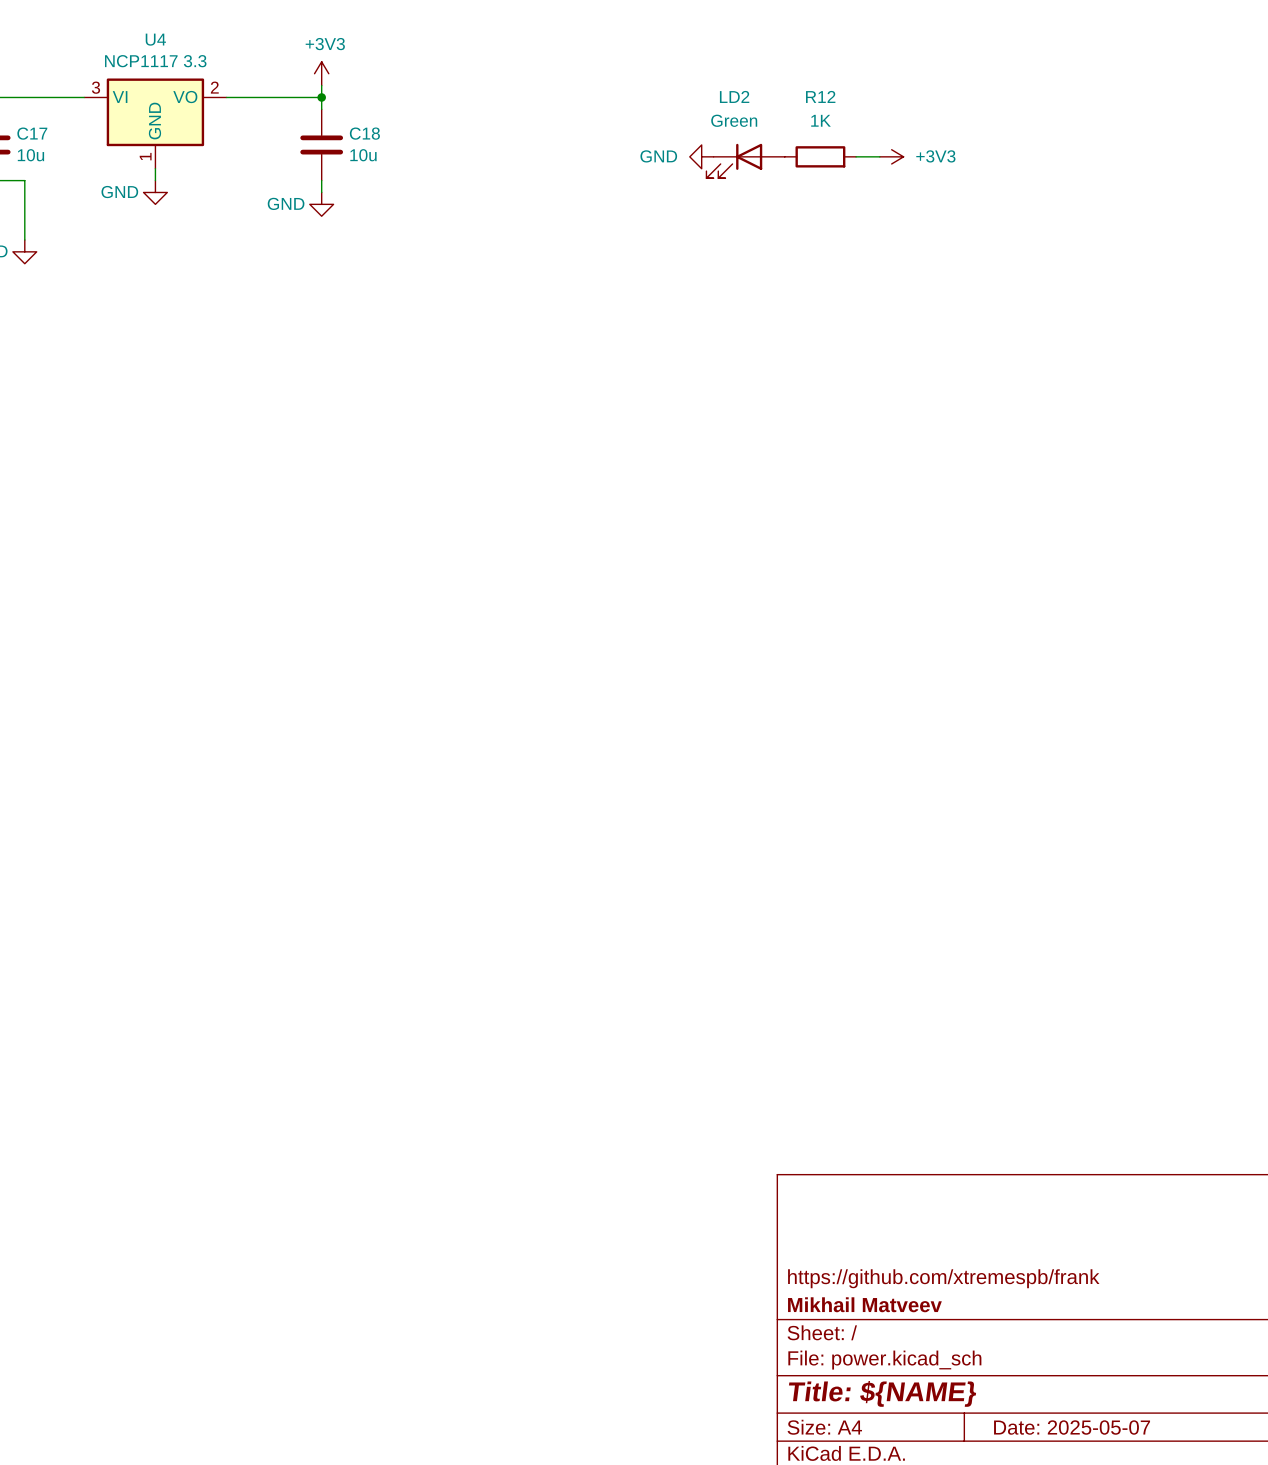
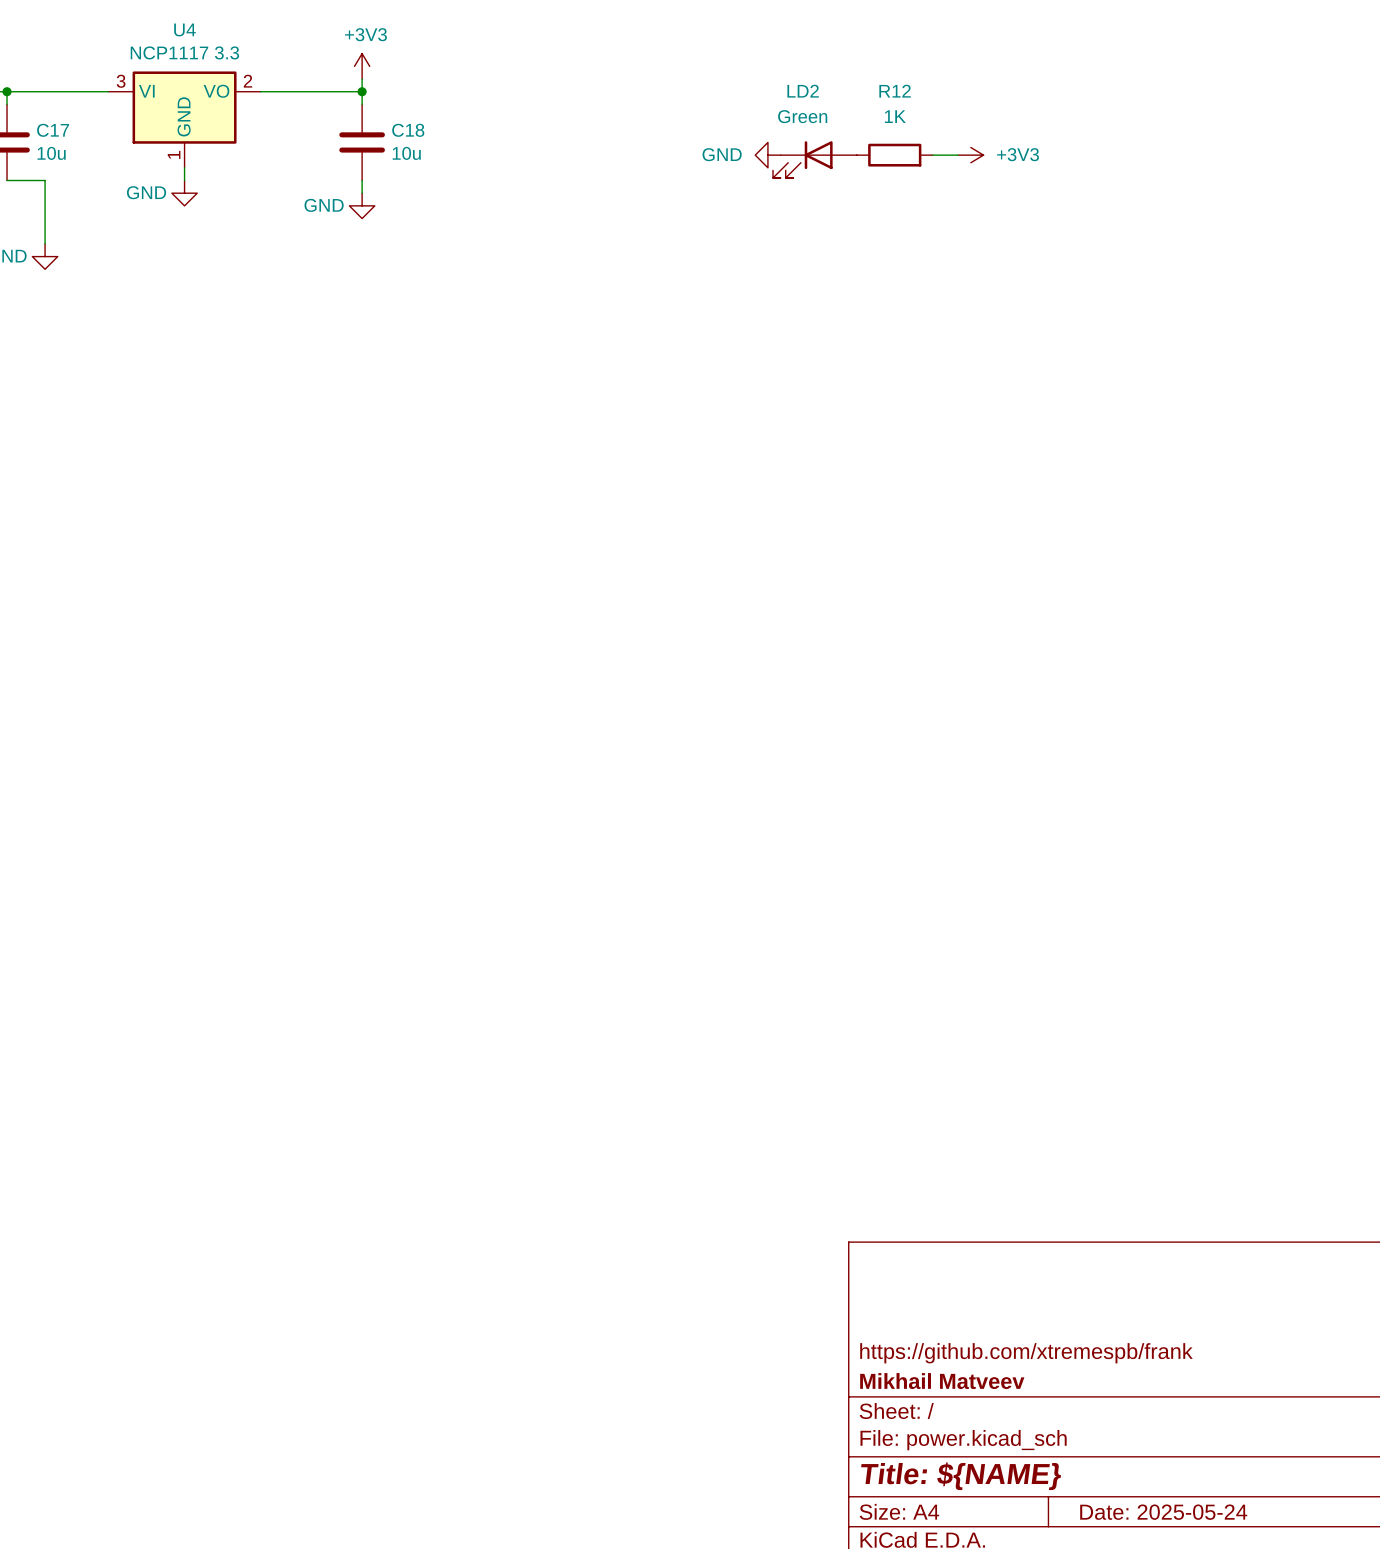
title block: Date: 2025-05-07 (1072, 1427) -> Date: 2025-05-24 (1163, 1512)

